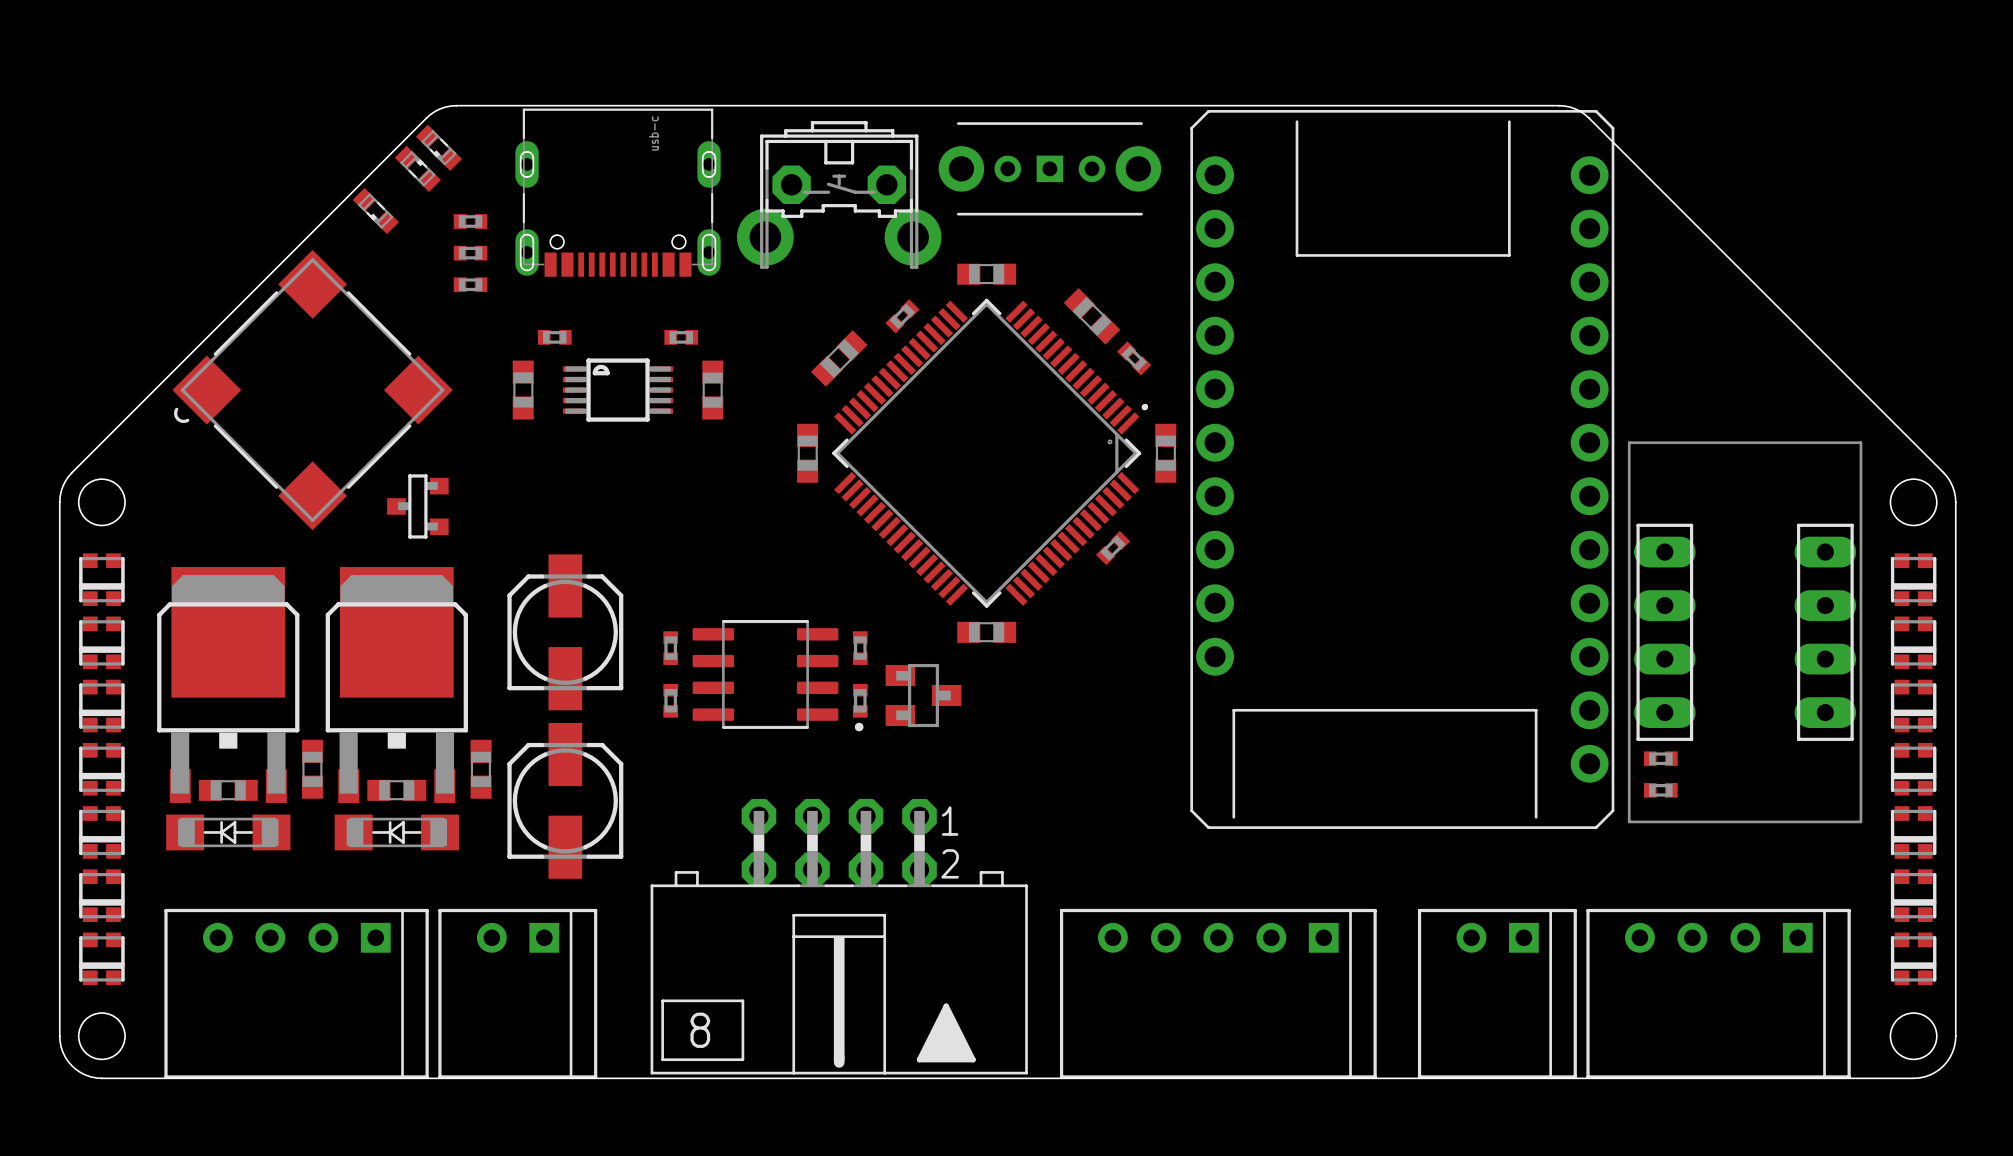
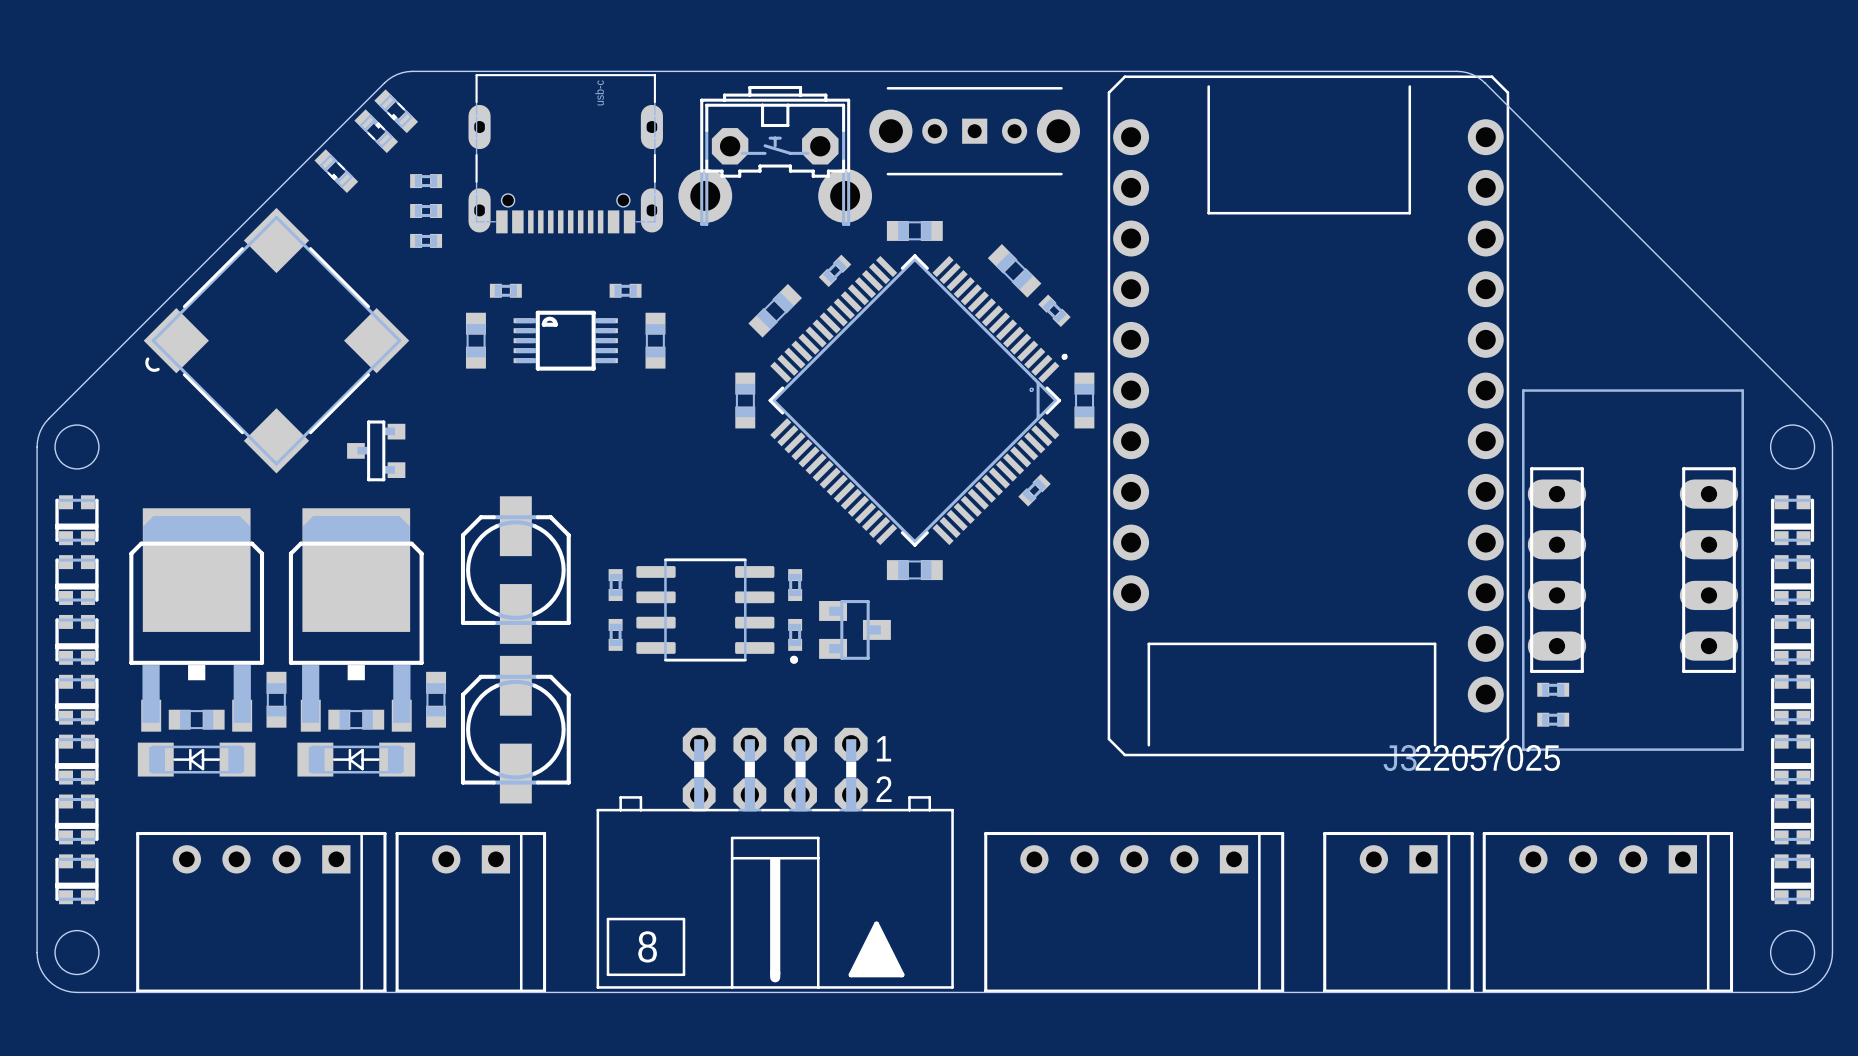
J3 name: none -> J3 (1400, 757)
J3 value: none -> 22057025 (1487, 757)

